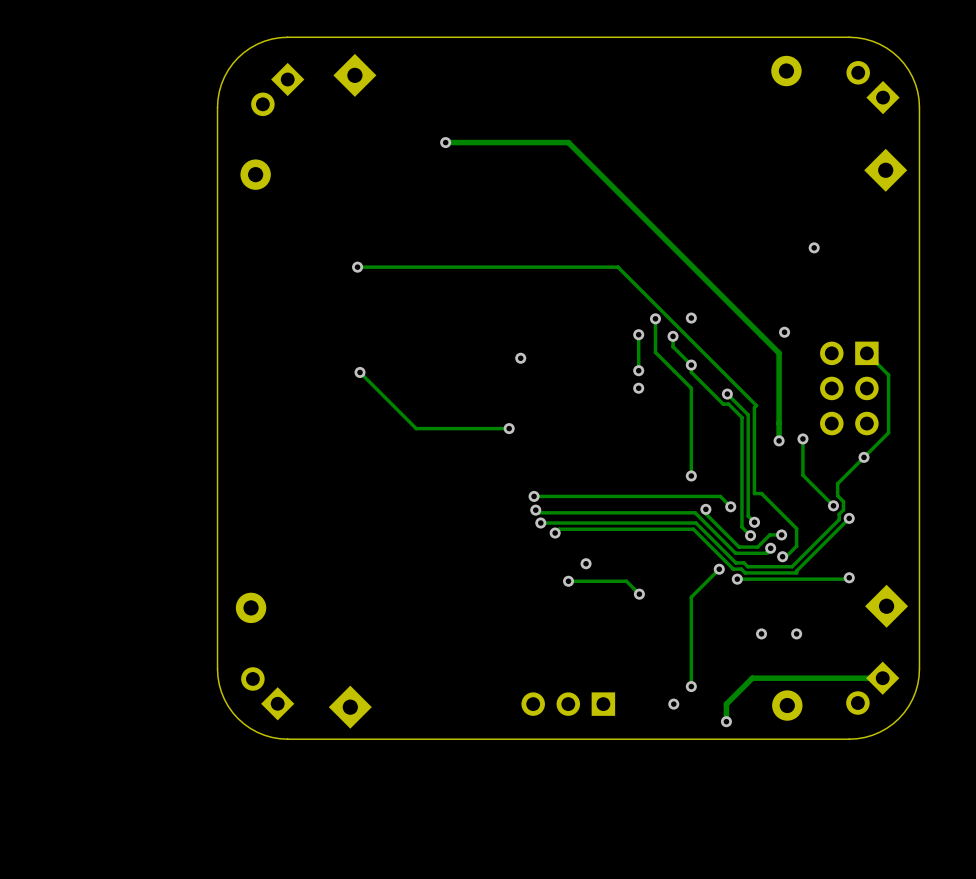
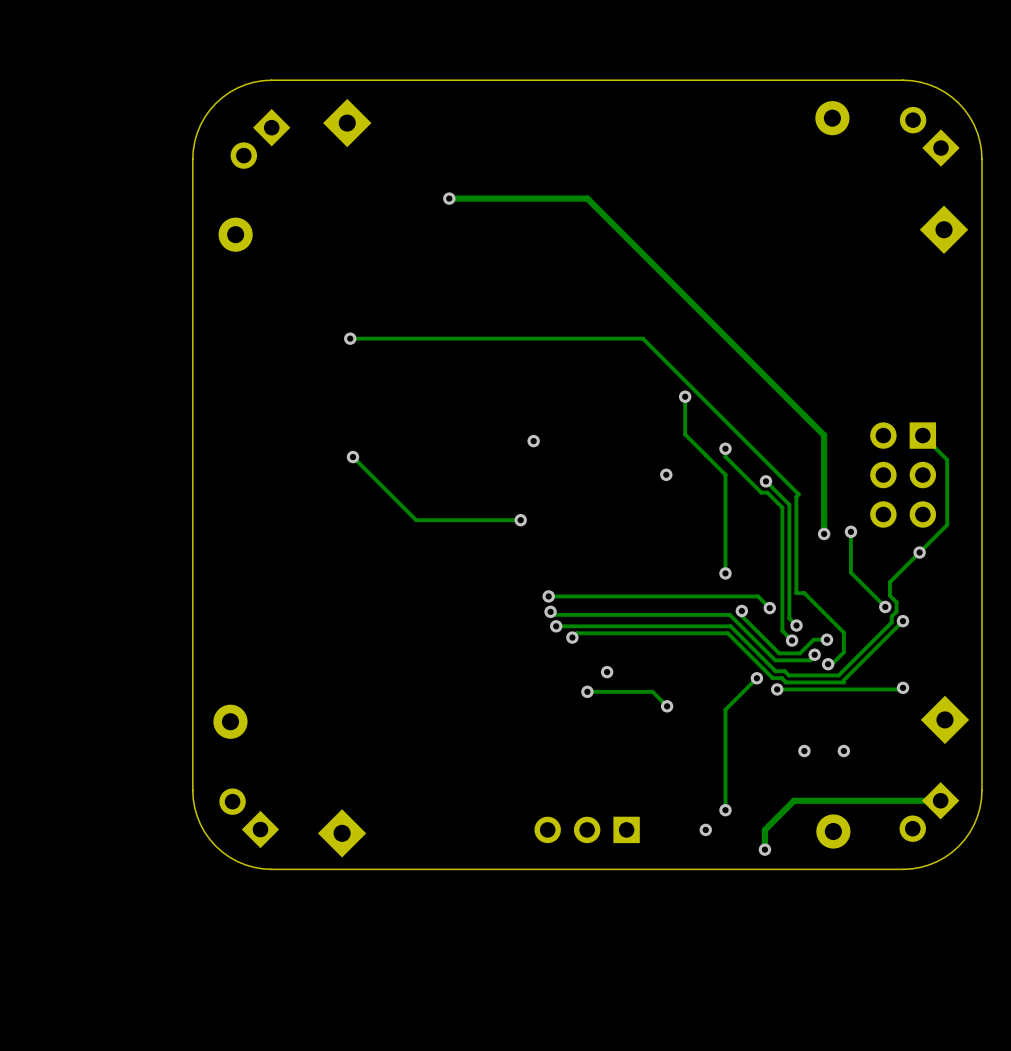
via: (814, 247) -> none
via: (691, 318) -> none
via: (784, 332) -> none
track: (638, 334) (638, 370) -> none
via: (638, 334) -> none
track: (673, 336) (673, 346) (691, 365) -> none
via: (673, 336) -> none
via: (638, 370) -> none

